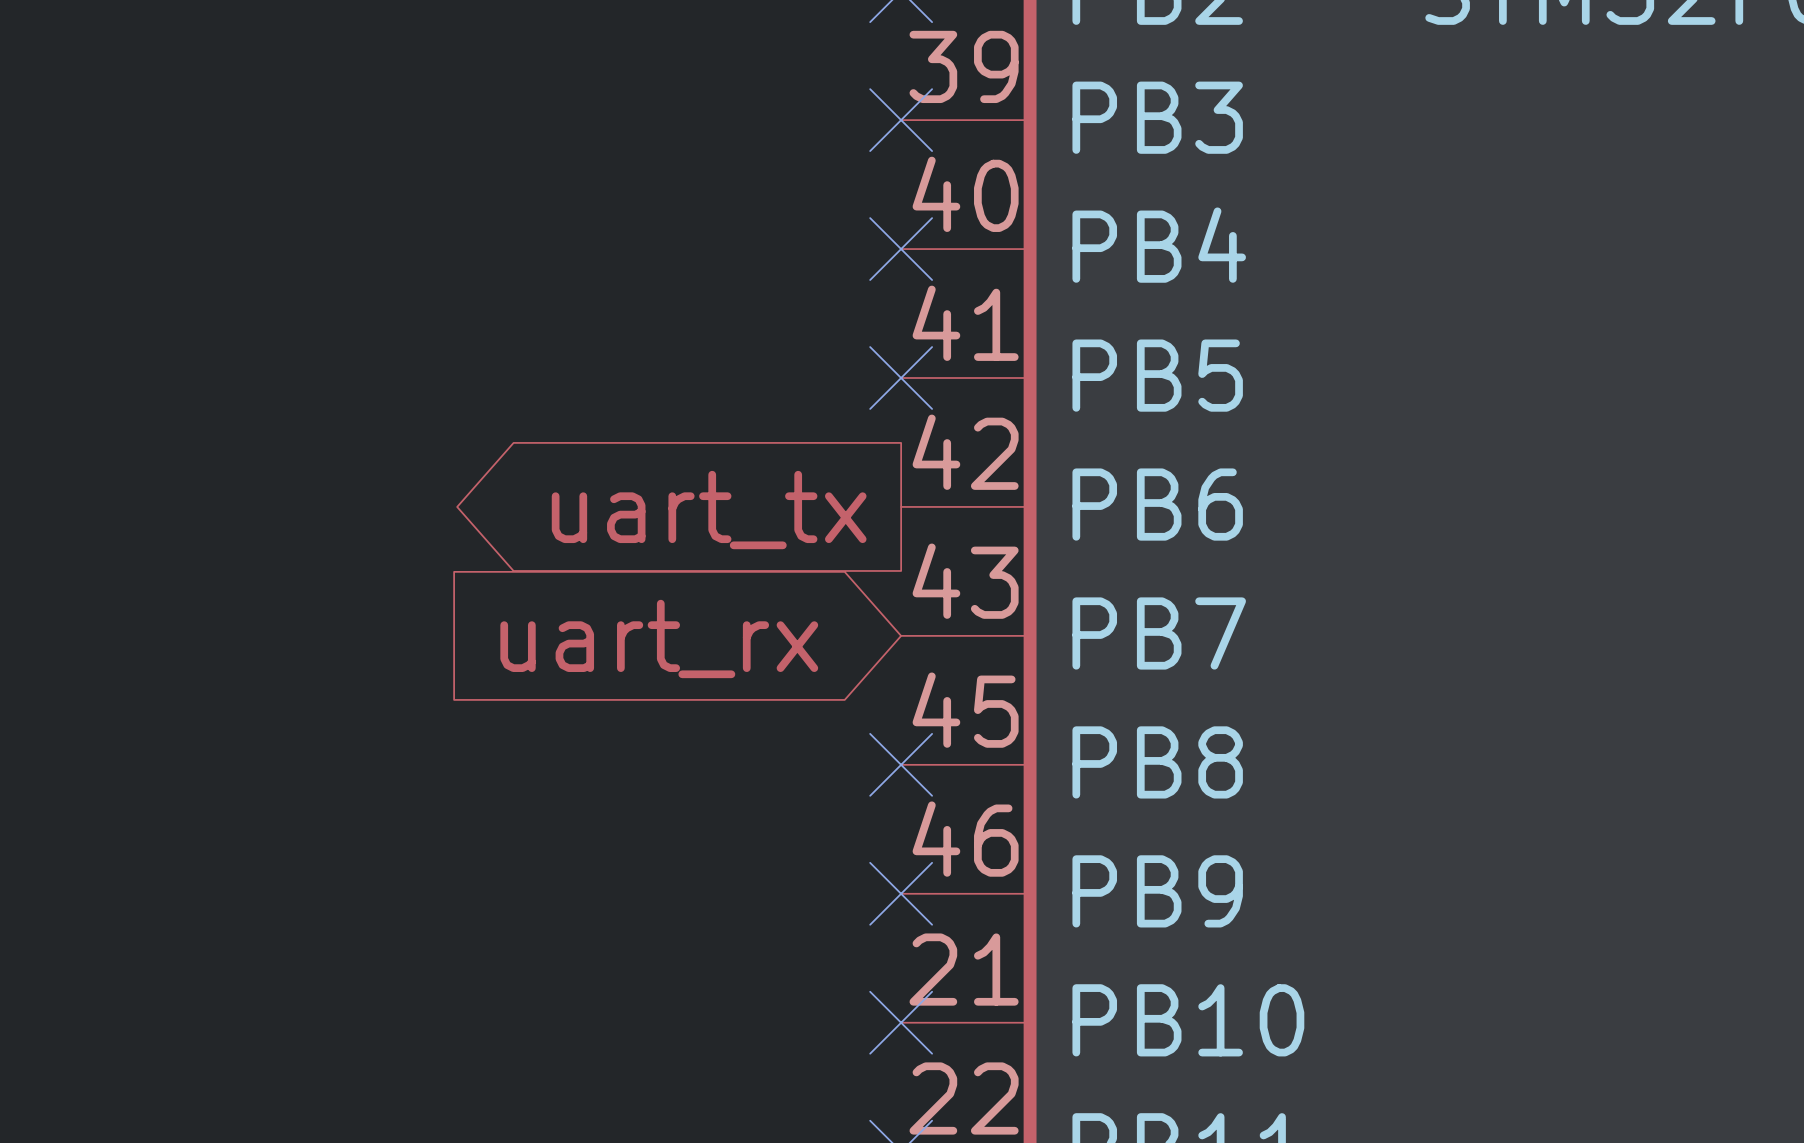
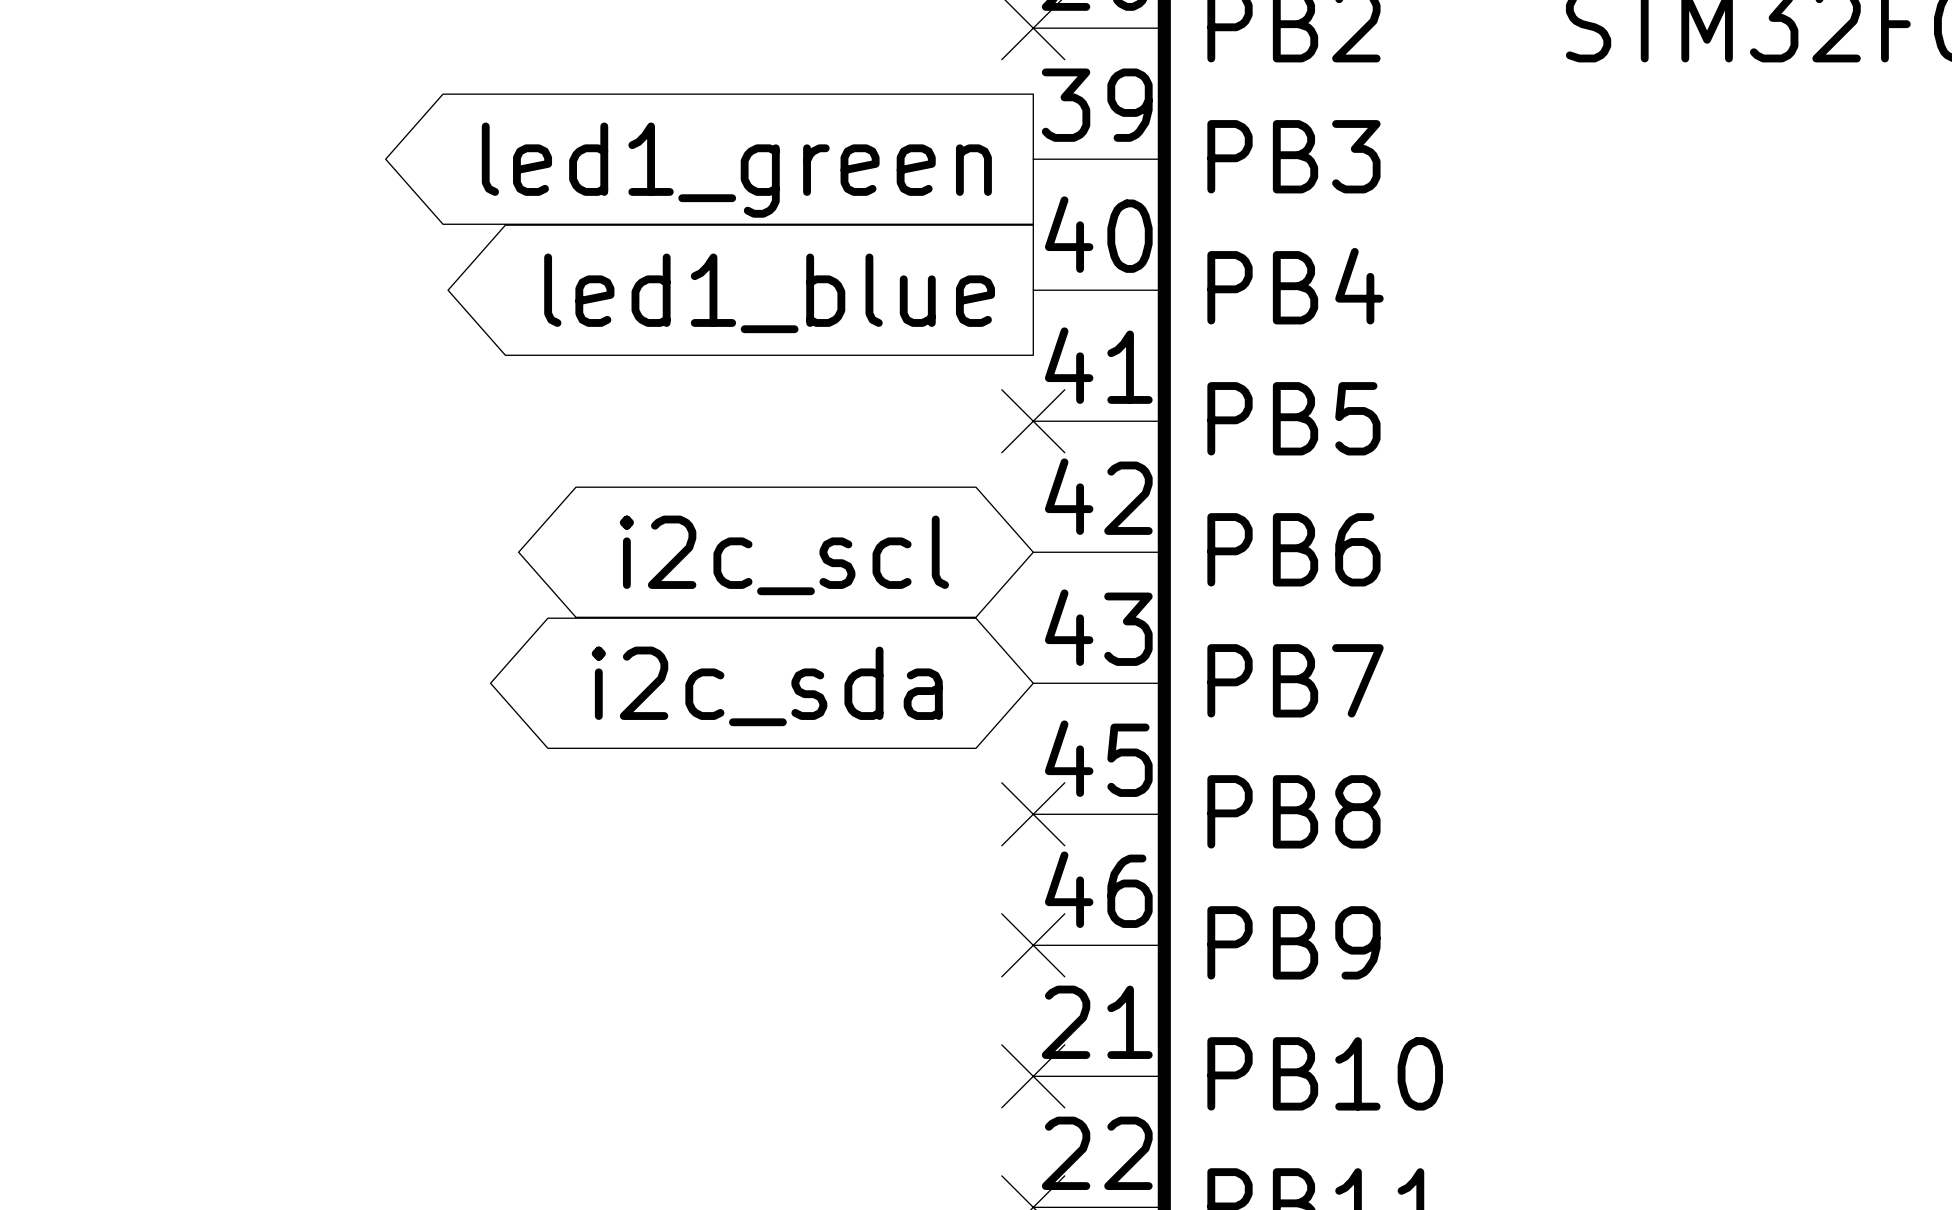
no-connect mark: (901, 120) -> none
global label: none -> led1_green (736, 170)
no-connect mark: (901, 249) -> none
global label: none -> led1_blue (769, 293)
global label shape: output (709, 510) -> bidirectional (784, 555)
global label: uart_tx (709, 510) -> i2c_scl (784, 555)
global label shape: input (659, 638) -> bidirectional (767, 686)
global label: uart_rx (659, 638) -> i2c_sda (767, 686)

